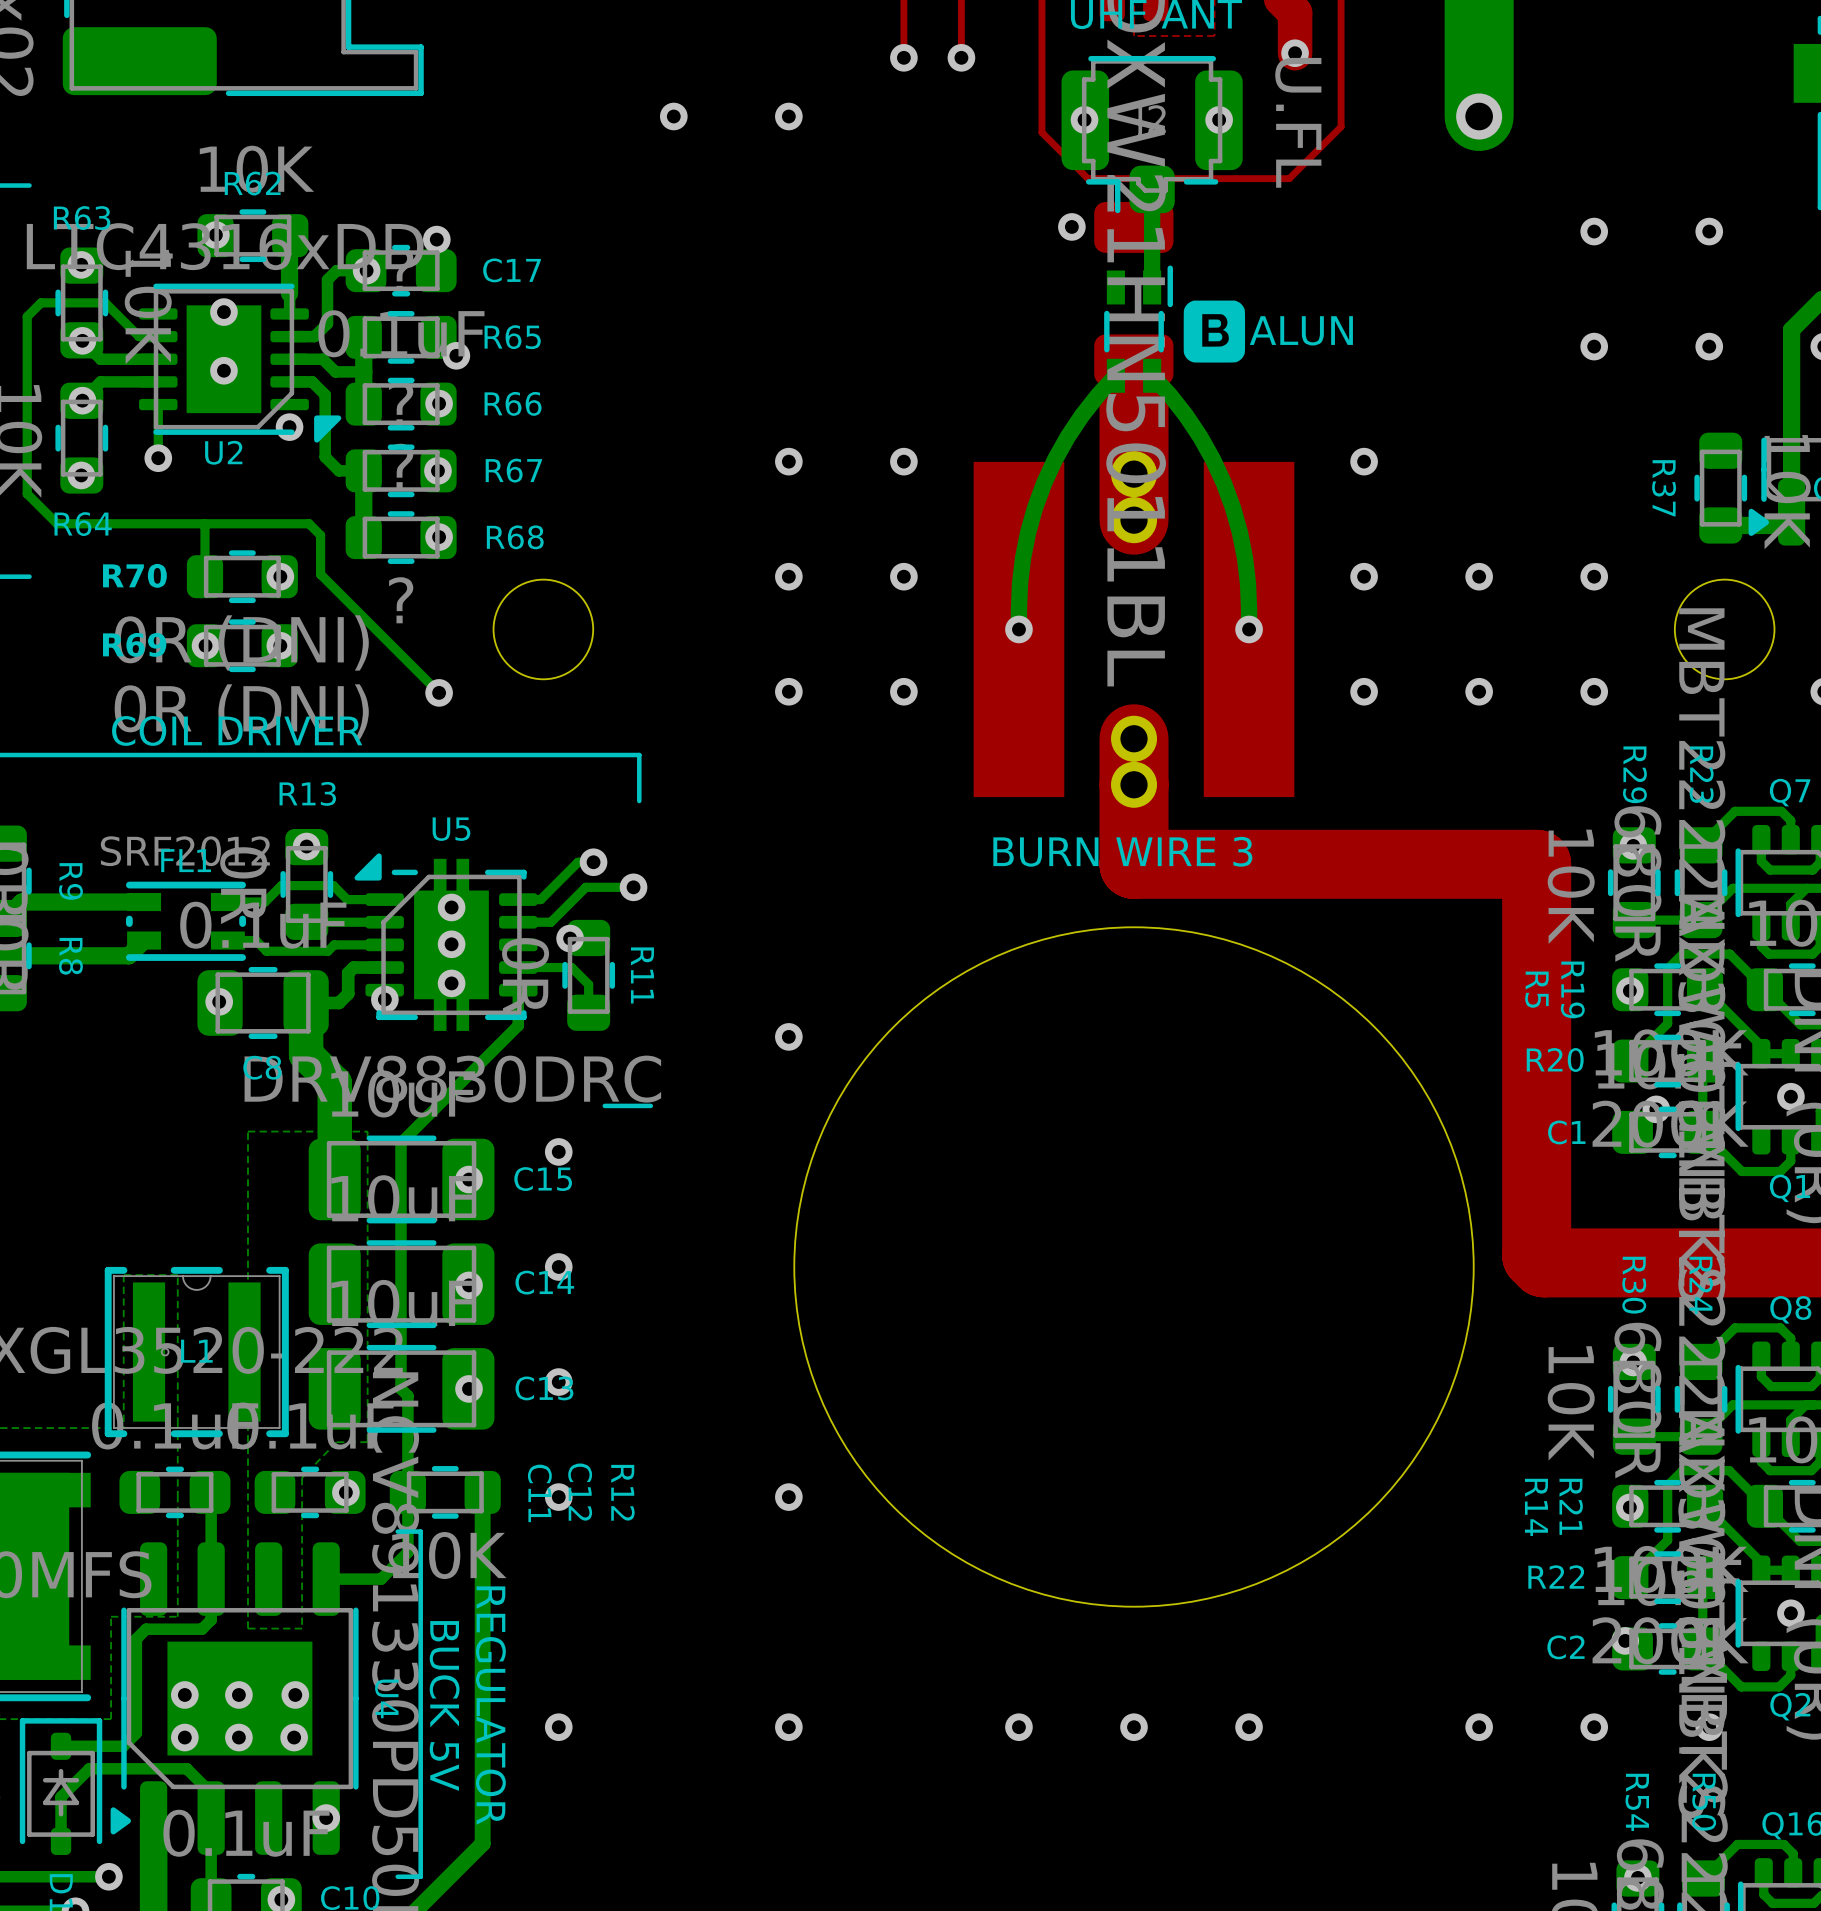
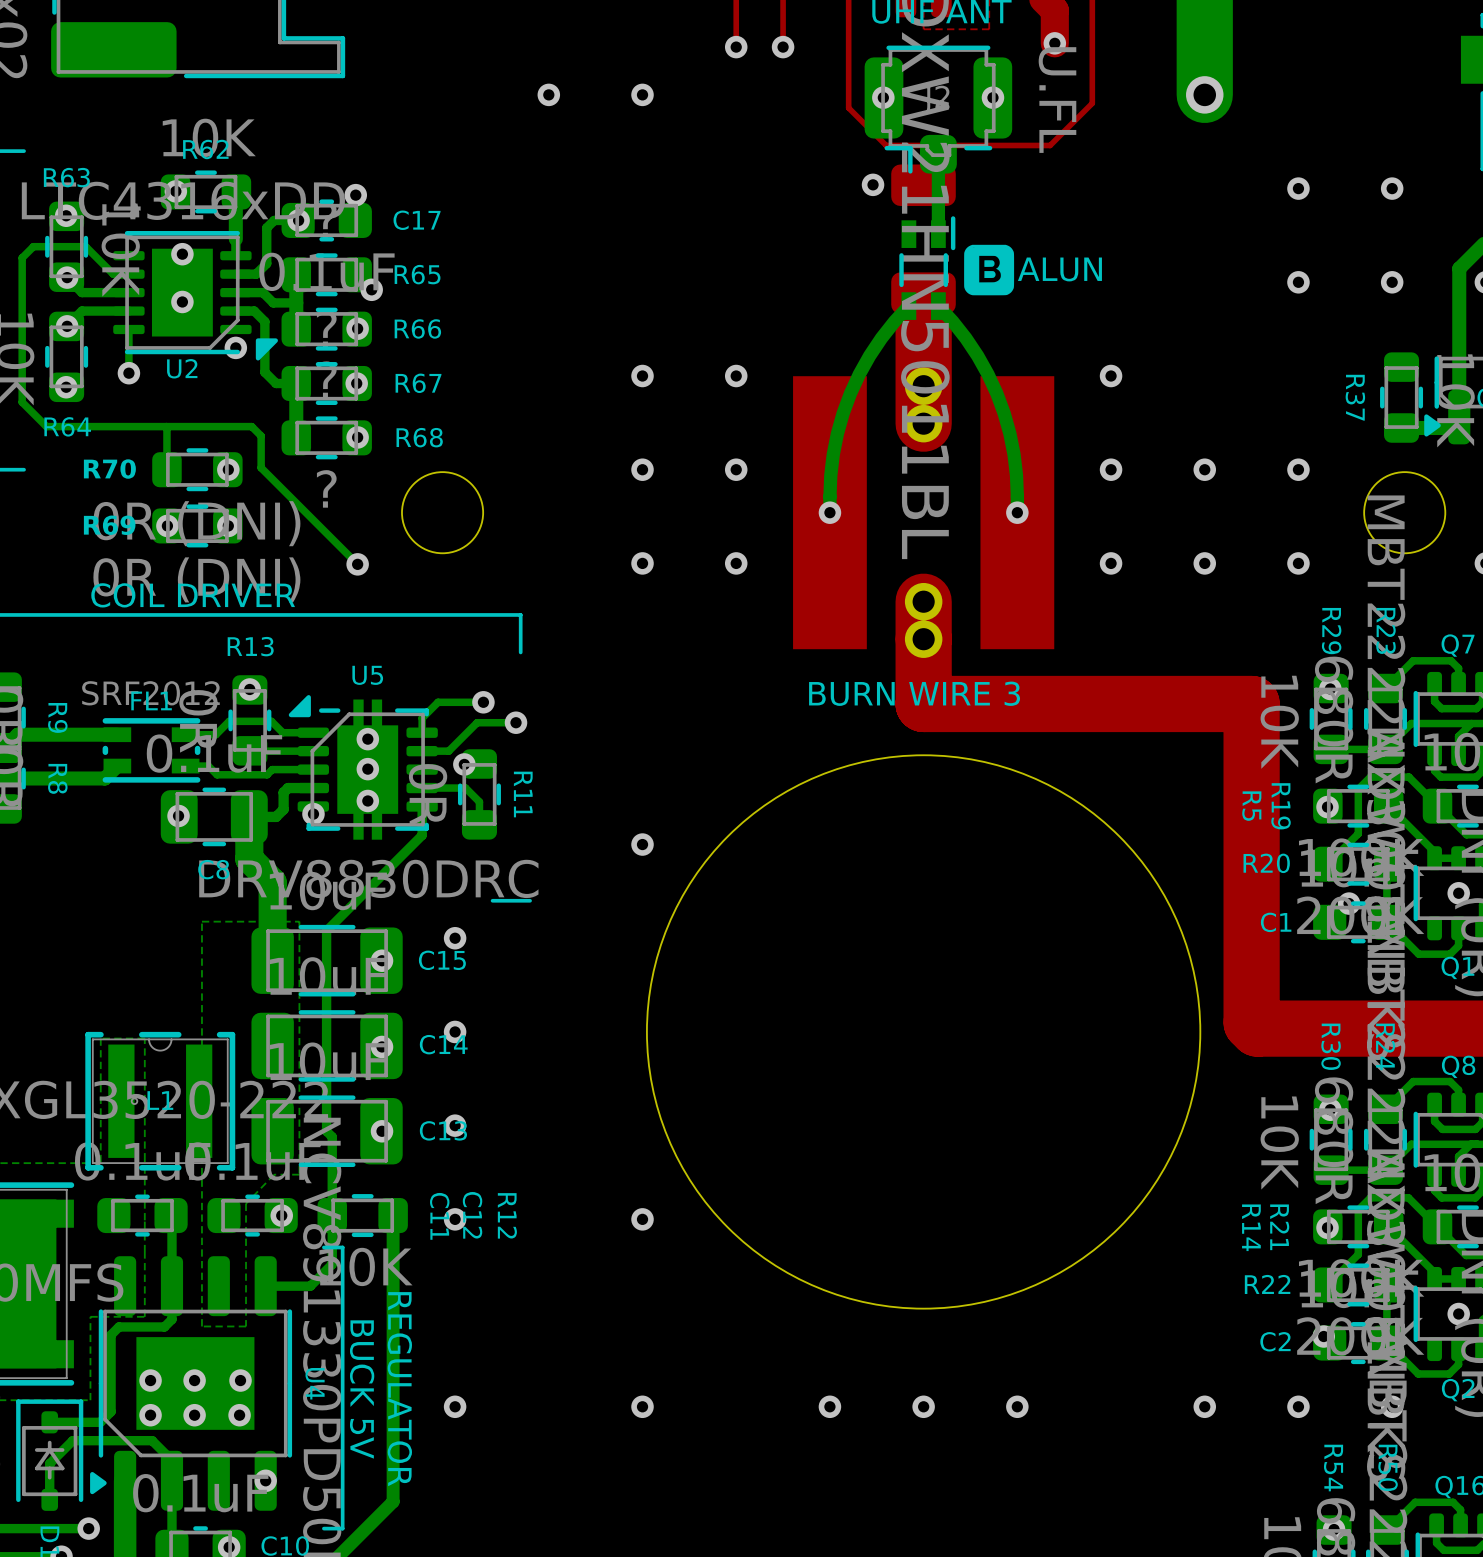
bottom track: (578, 862) (540, 899) (518, 899) -> (470, 702) (438, 702) (422, 718) (422, 732)

